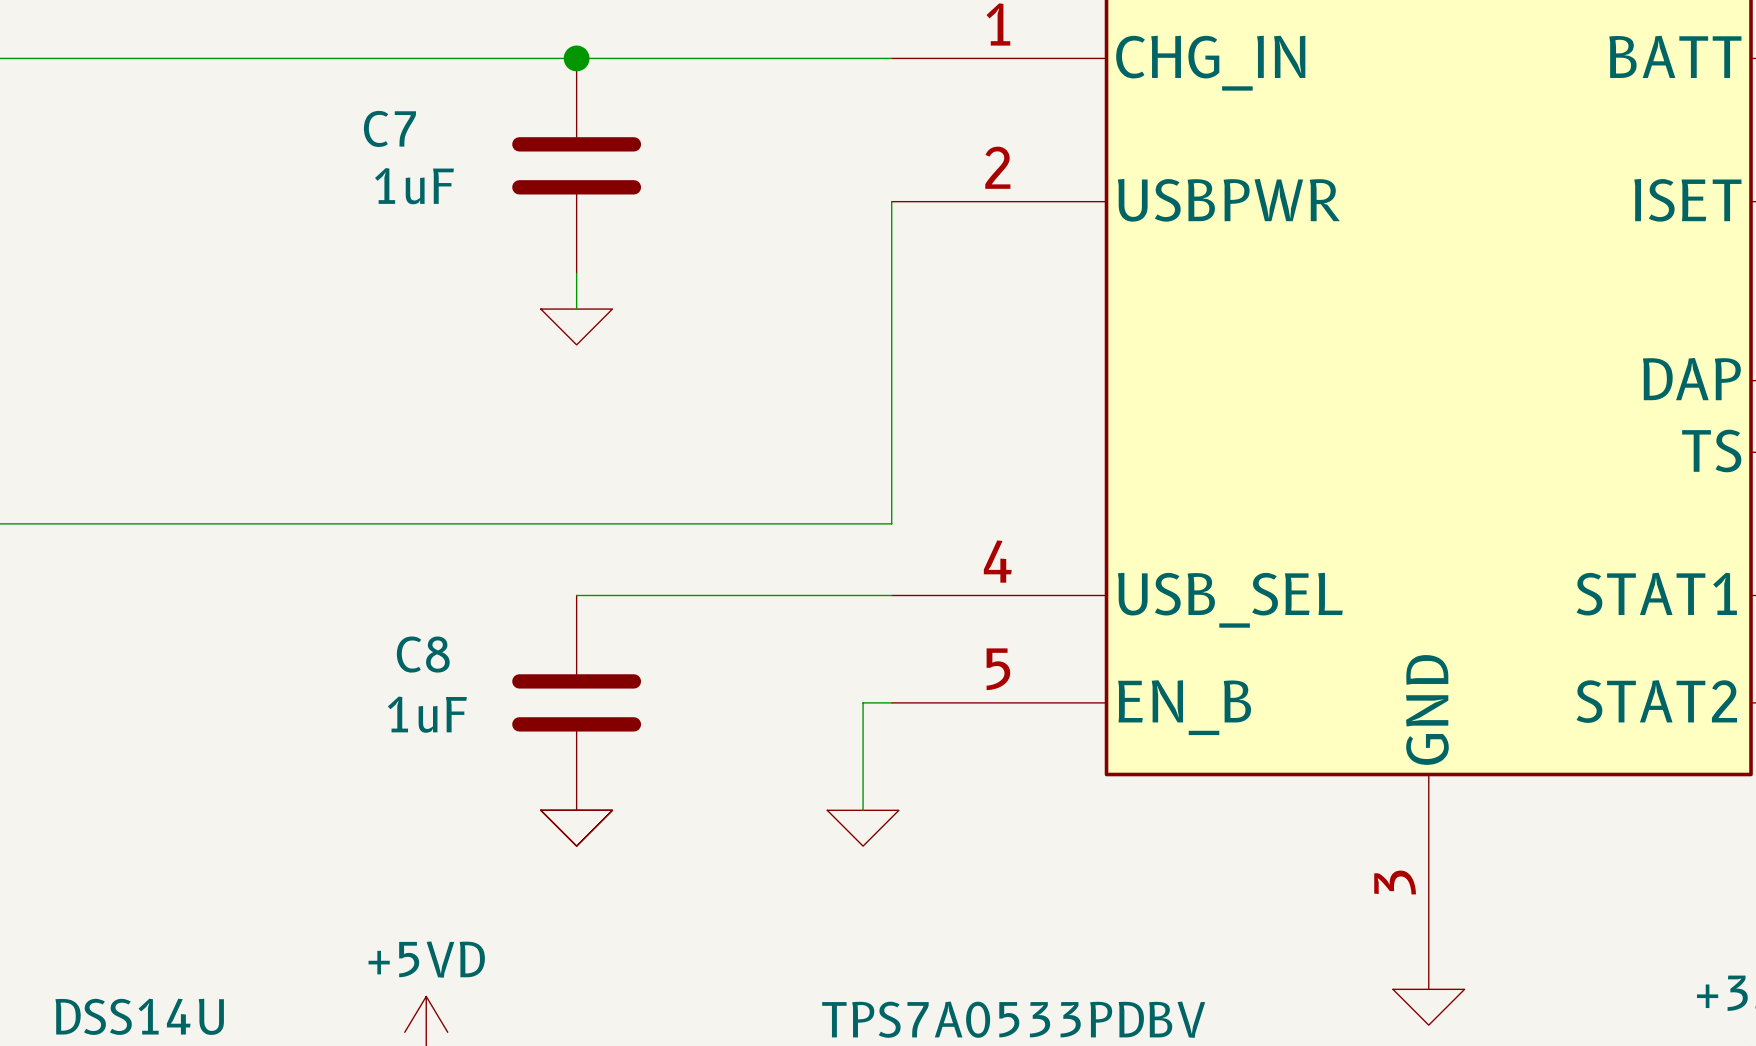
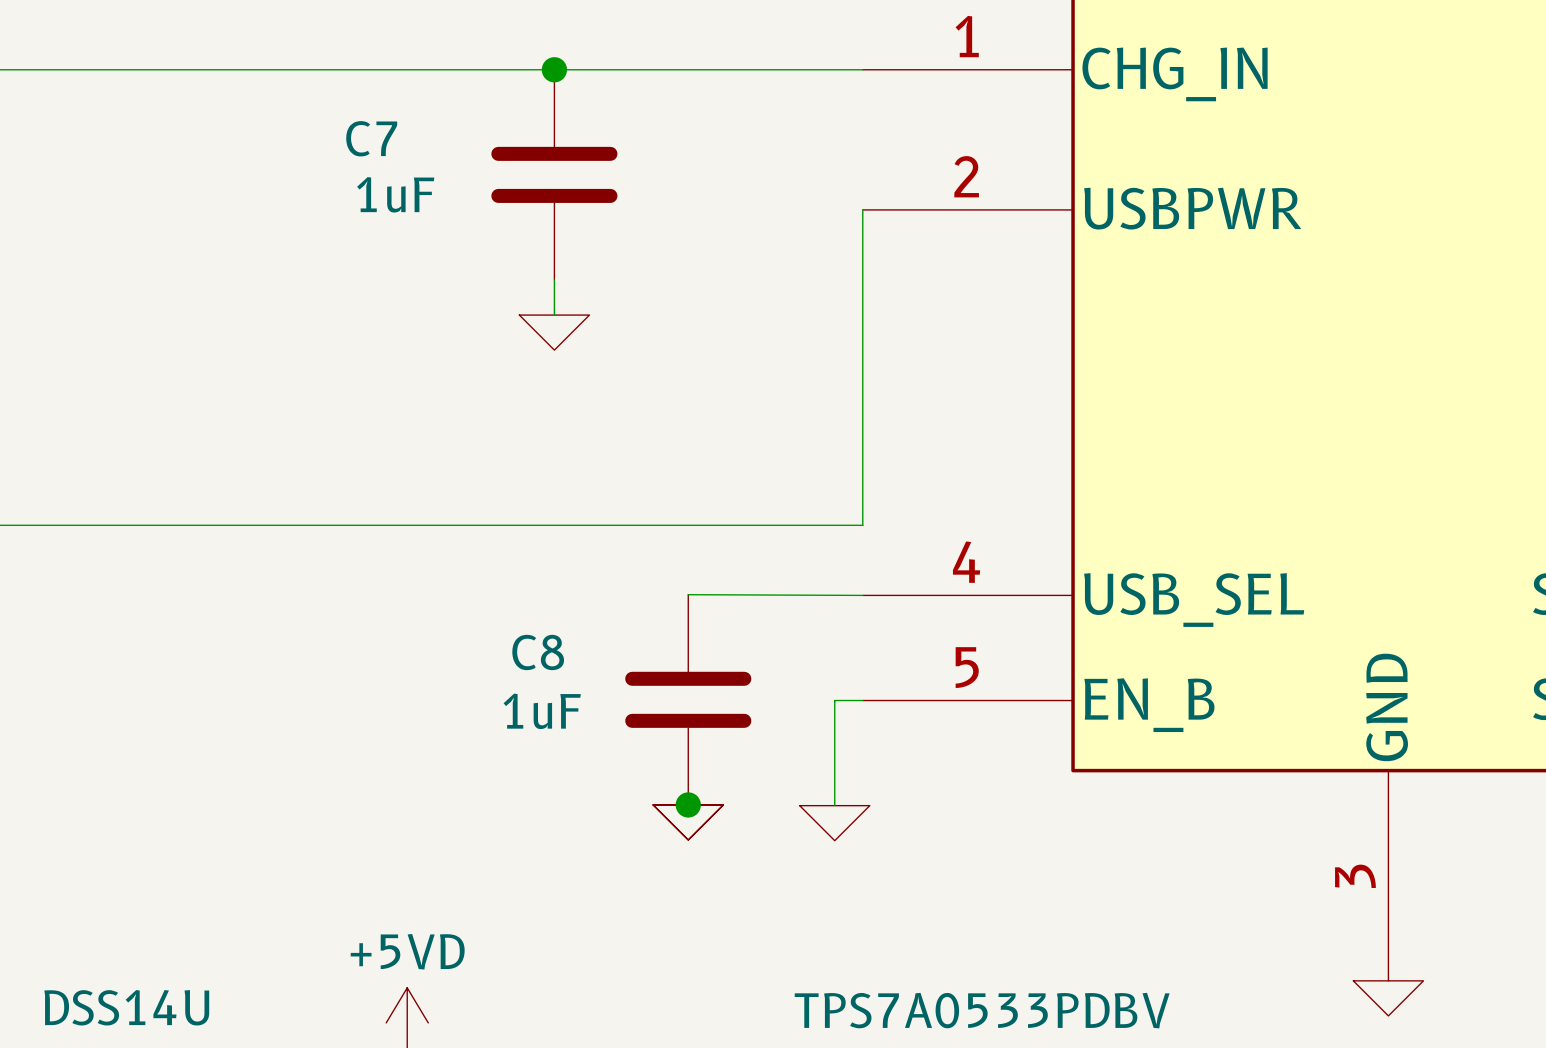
wire: (576, 595) (891, 595) -> (688, 594) (862, 595)
C8 position: (576, 702) -> (688, 699)
junction: none -> (688, 804)
power symbol position: (576, 828) -> (688, 822)

